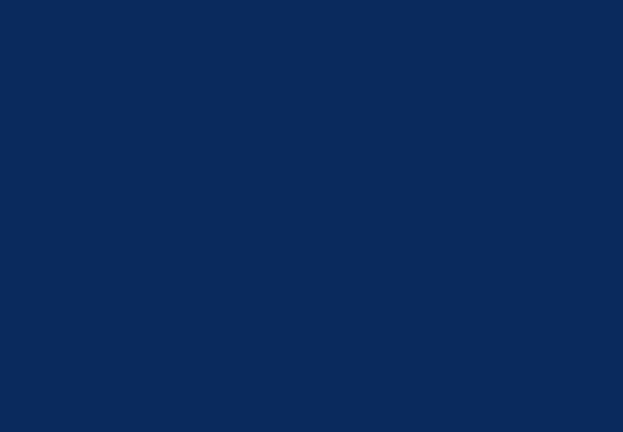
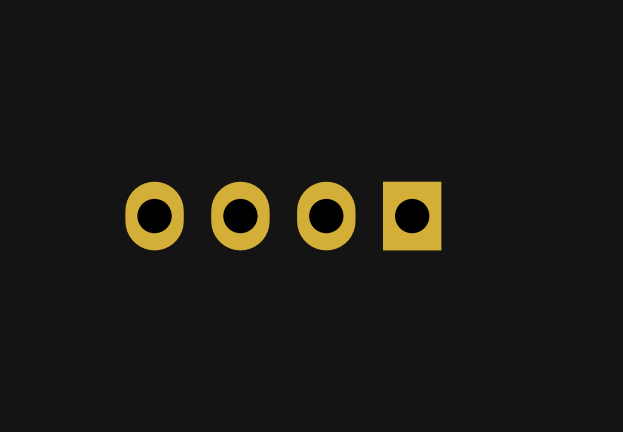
part: none -> (283, 216)

